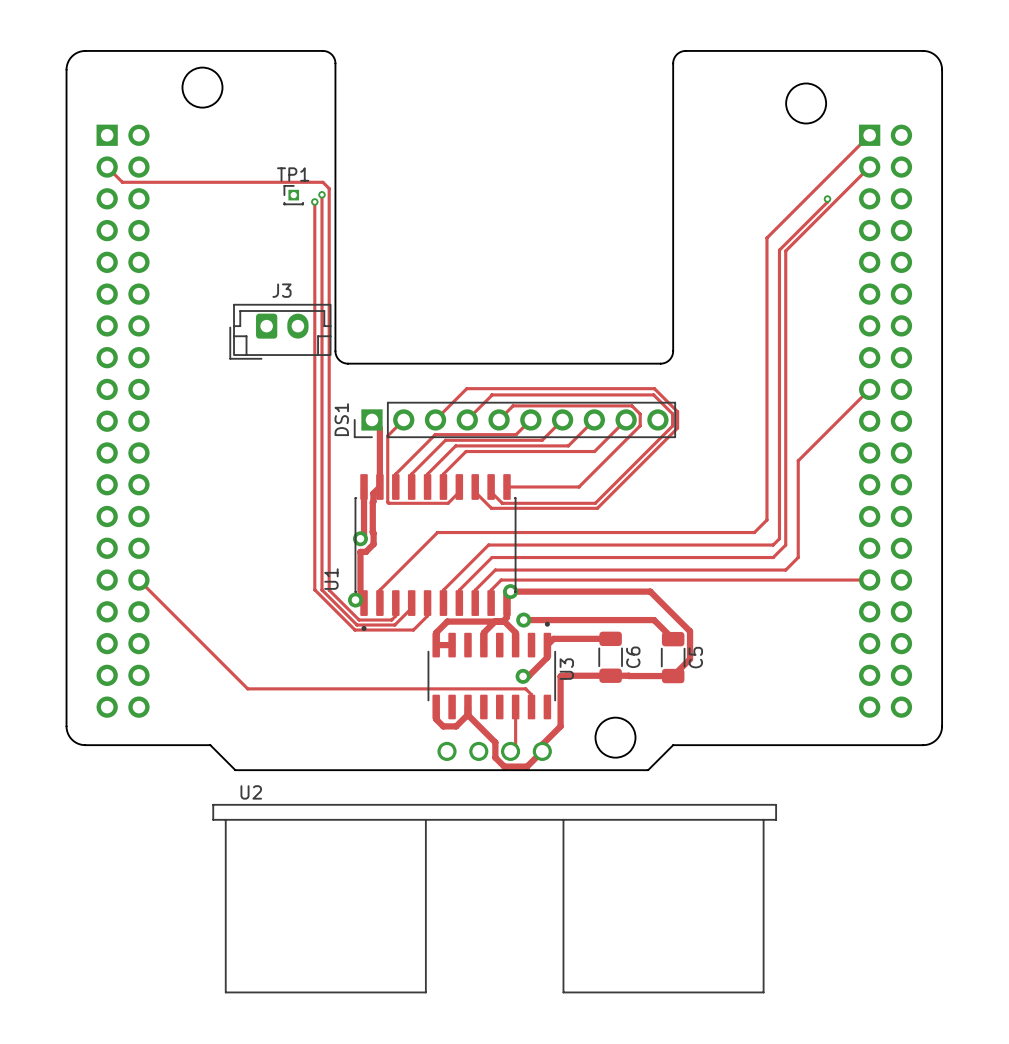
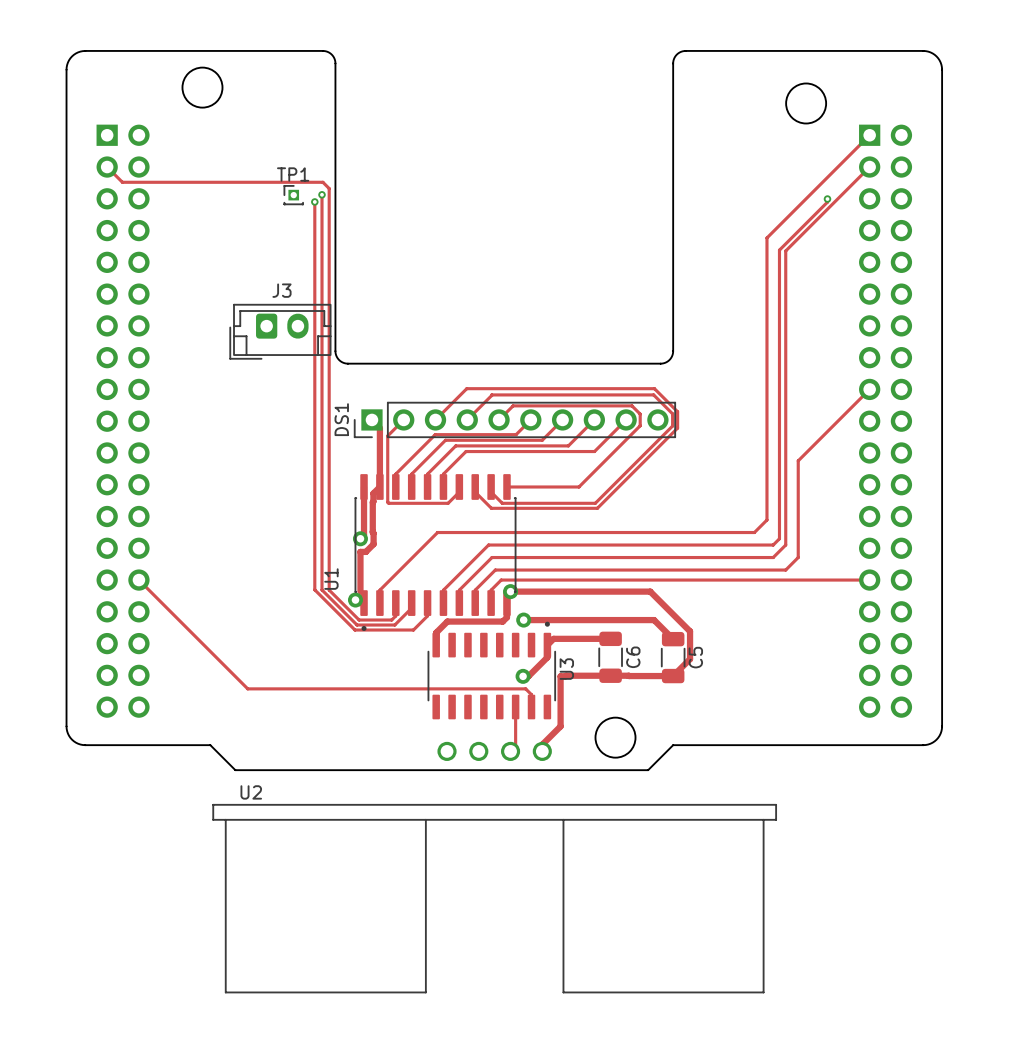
track: (495, 621) (483, 632) (483, 645) -> none
track: (502, 621) (515, 632) (515, 645) -> none
track: (436, 645) (452, 645) -> none
track: (436, 707) (436, 719) (443, 726) (456, 726) (467, 714) -> none
track: (467, 707) (467, 715) (495, 742) (495, 757) (504, 766) (527, 766) (542, 751) -> none

